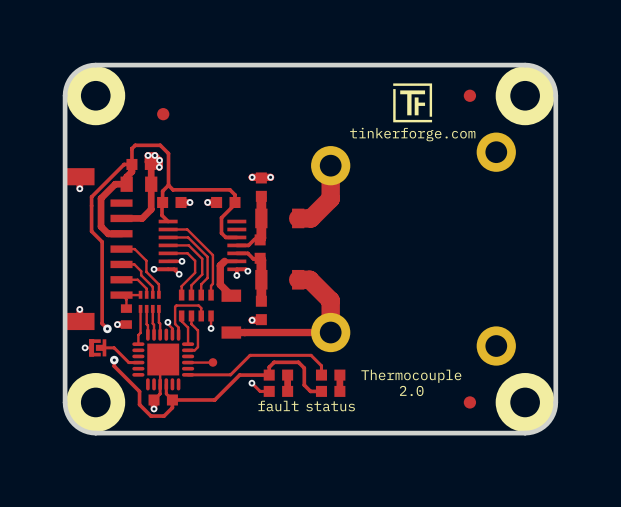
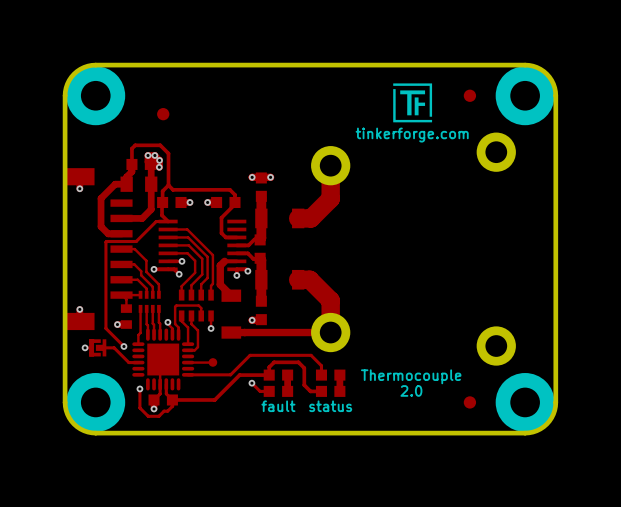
track: (131, 164) (124, 164) (91, 196) (91, 231) (102, 241) (102, 323) (107, 328) -> none
track: none -> (168, 221) (156, 221) (136, 241) (105, 242) (105, 328) (123, 346)
via: (107, 328) -> none
via: none -> (123, 346)
track: (114, 360) (114, 366) (139, 391) (139, 404) (150, 416) (164, 416) (172, 406) -> (139, 388) (139, 407) (148, 416) (158, 416) (172, 406)
via: (114, 360) -> none
via: none -> (139, 388)

